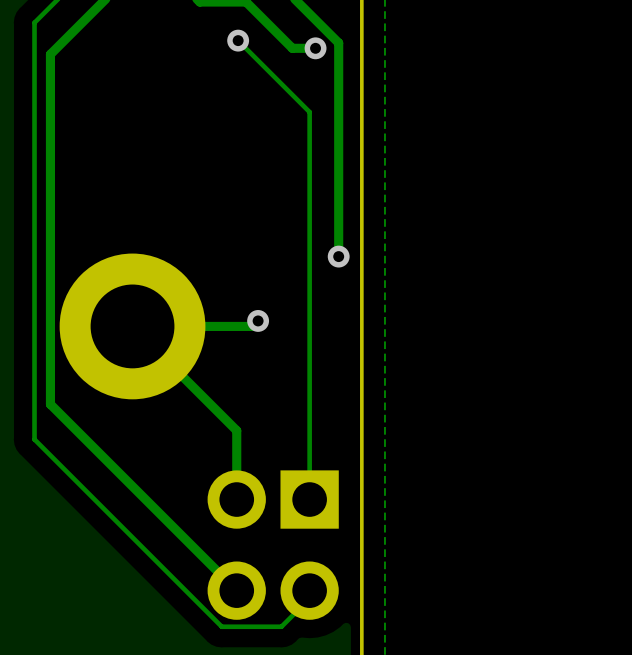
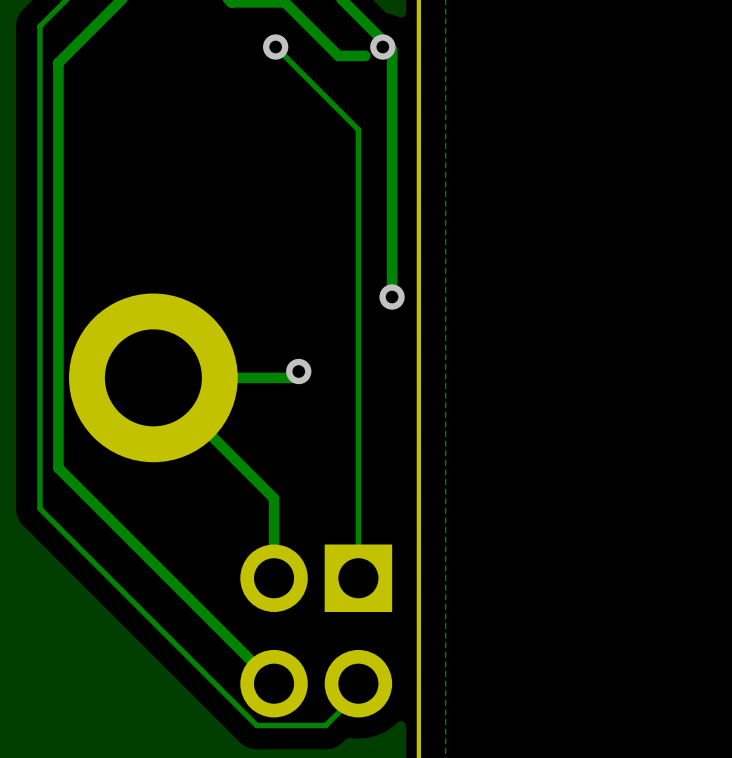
via position: (315, 48) -> (382, 47)

